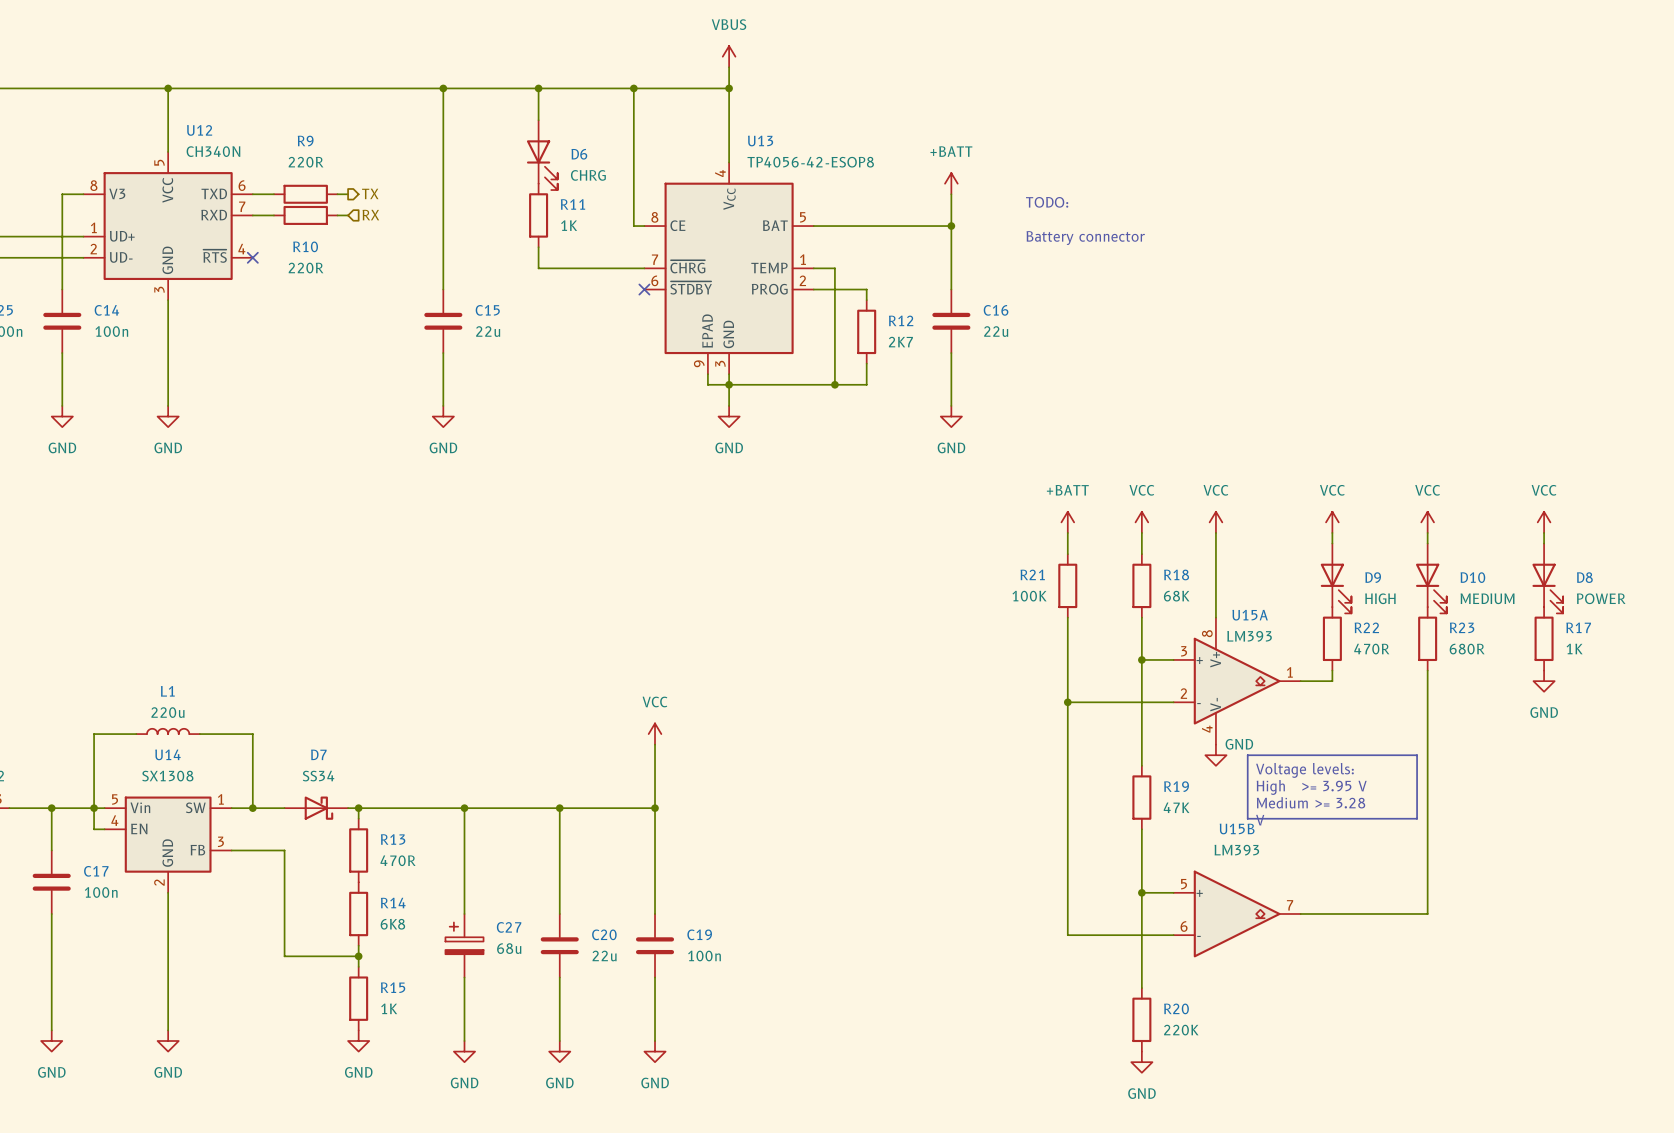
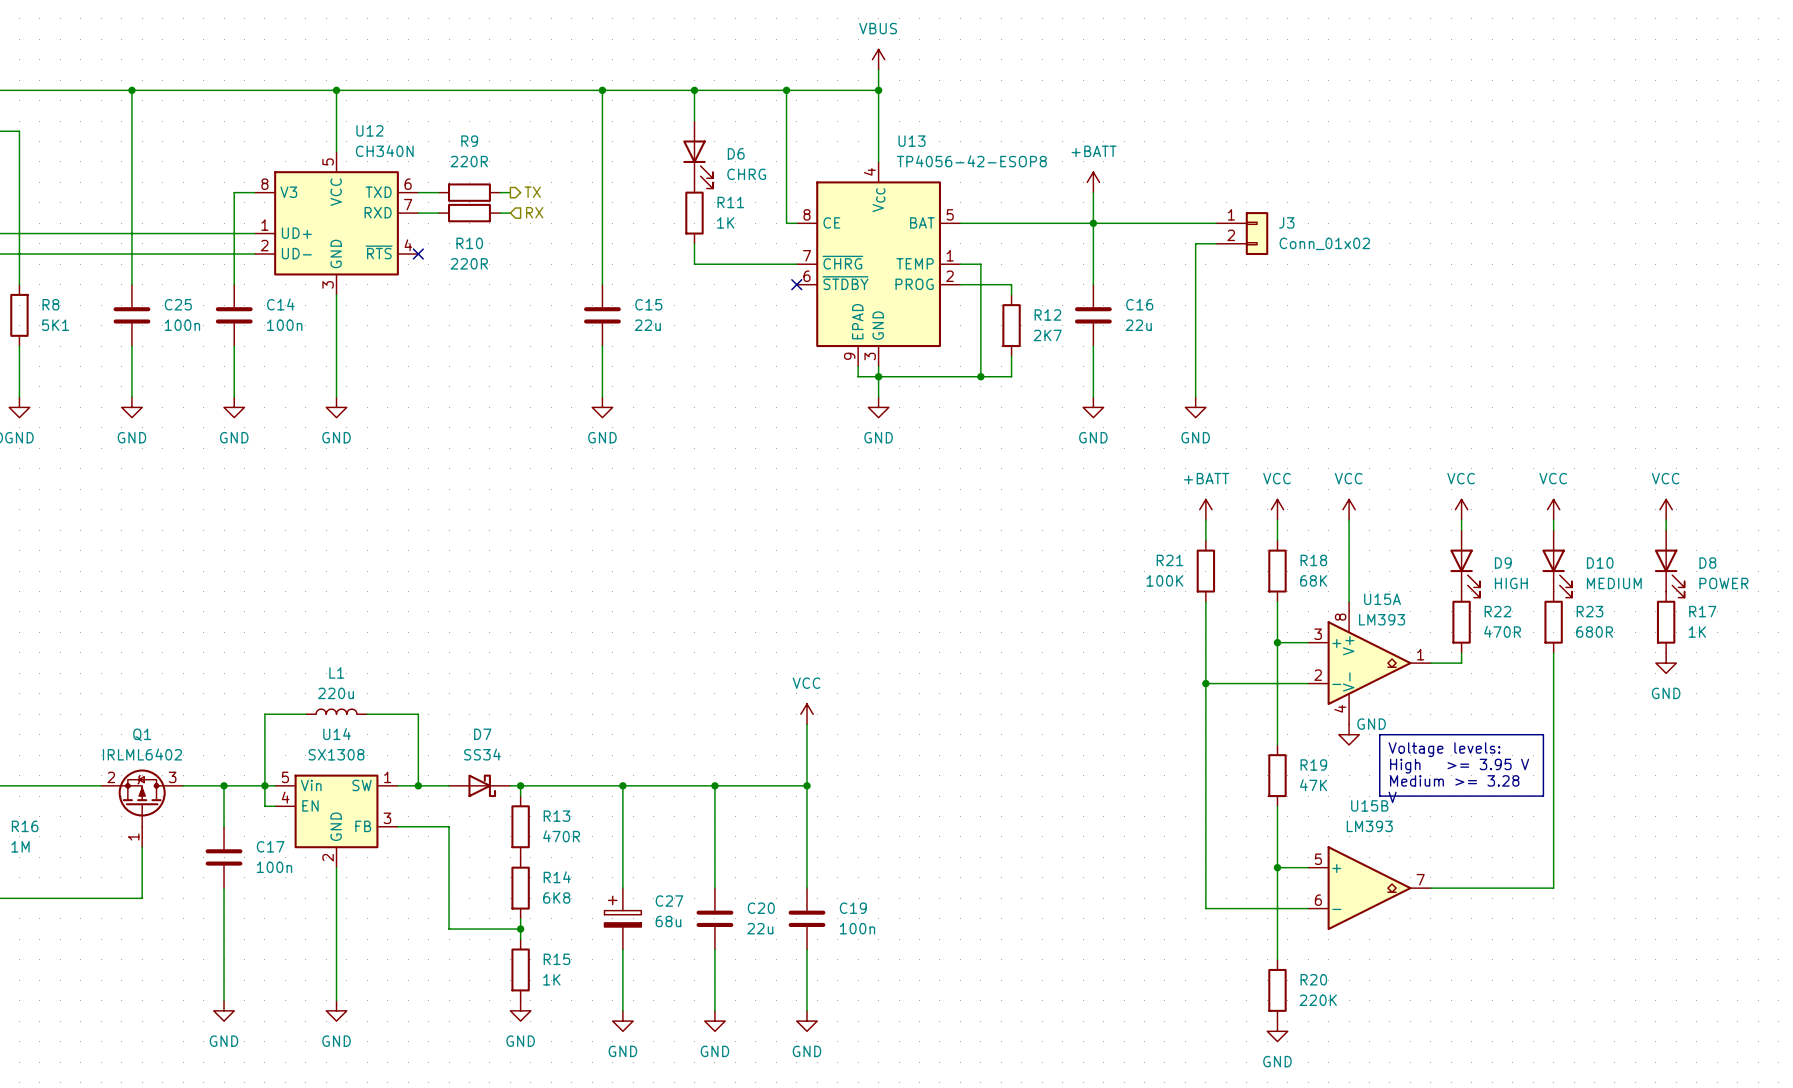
text: TODO: (1047, 202) -> none
wire: none -> (1093, 223) (1216, 223)
J3: none -> Conn_01x02 (1242, 233)
text: Battery connector (1085, 238) -> none
wire: none -> (1216, 243) (1195, 243) (1195, 397)
power symbol: none -> GND (1195, 407)

